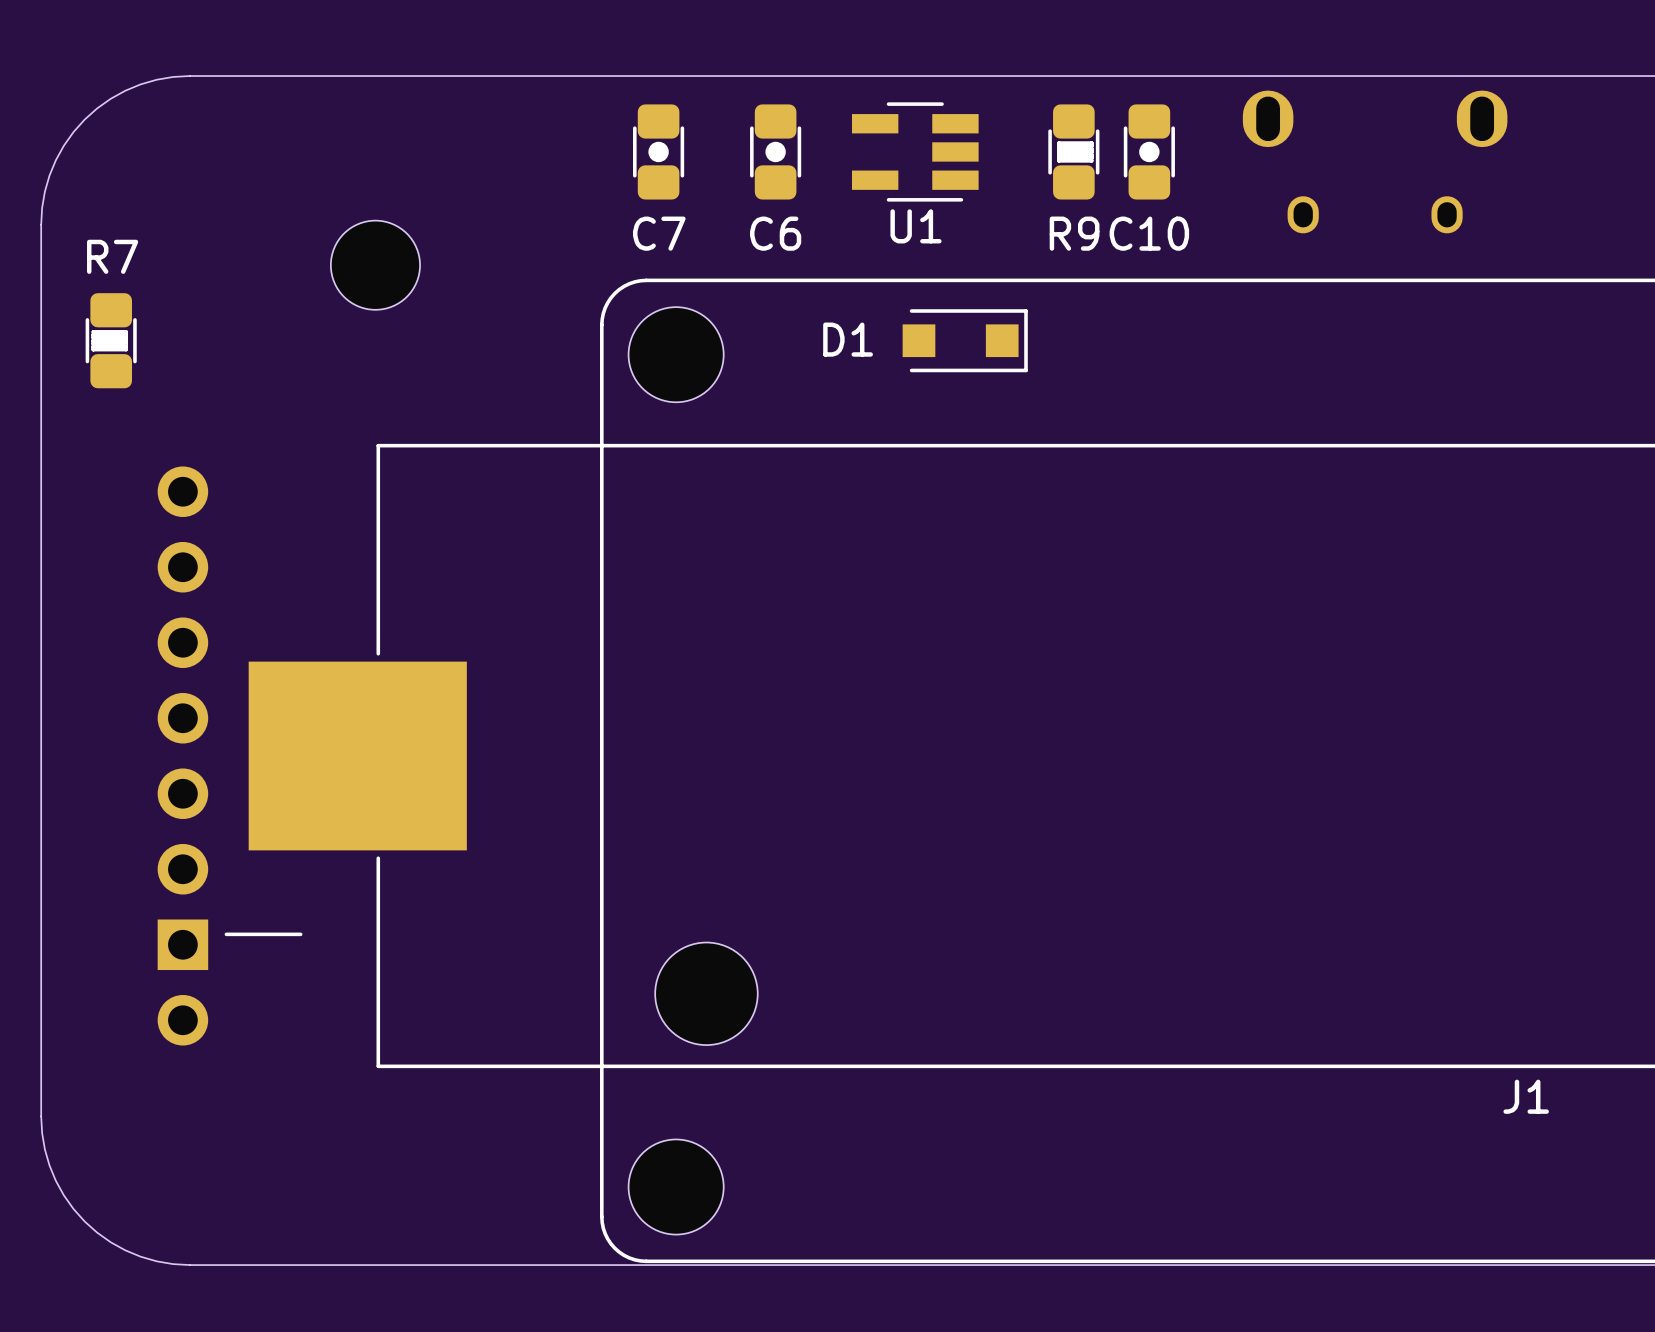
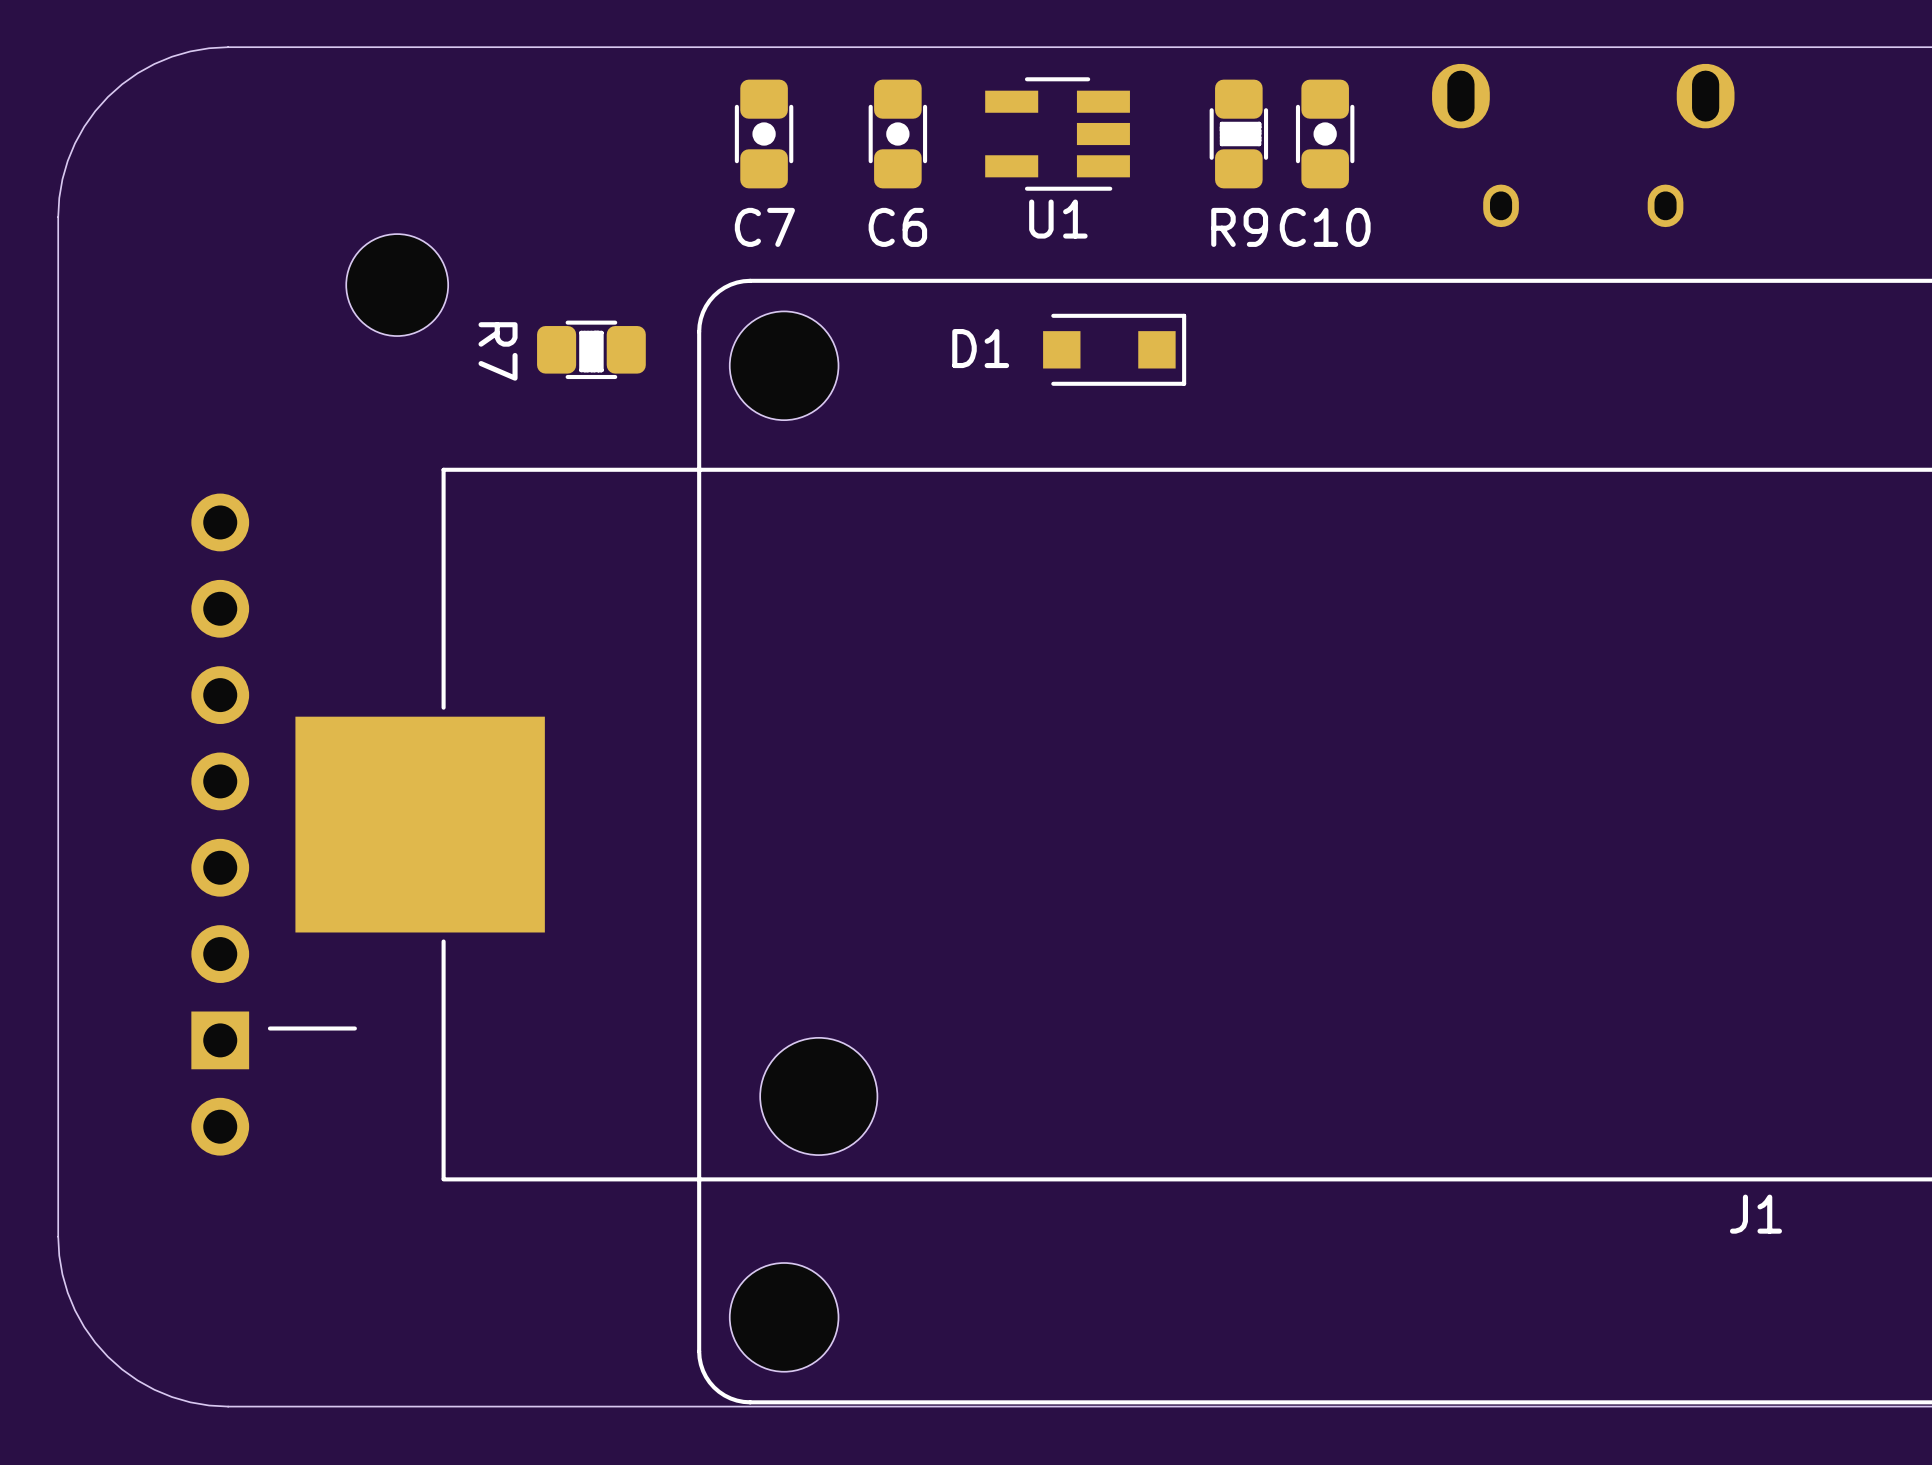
part position: (375, 265) -> (397, 285)
R7 rotation: 0° (111, 340) -> 90° counterclockwise (591, 349)
R7 position: (111, 340) -> (591, 349)

